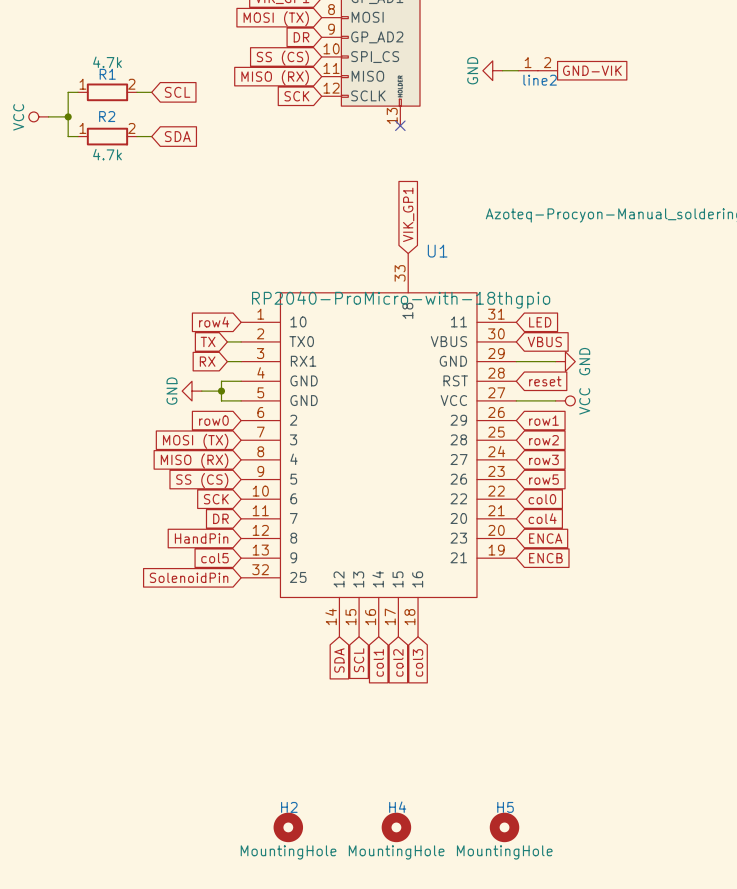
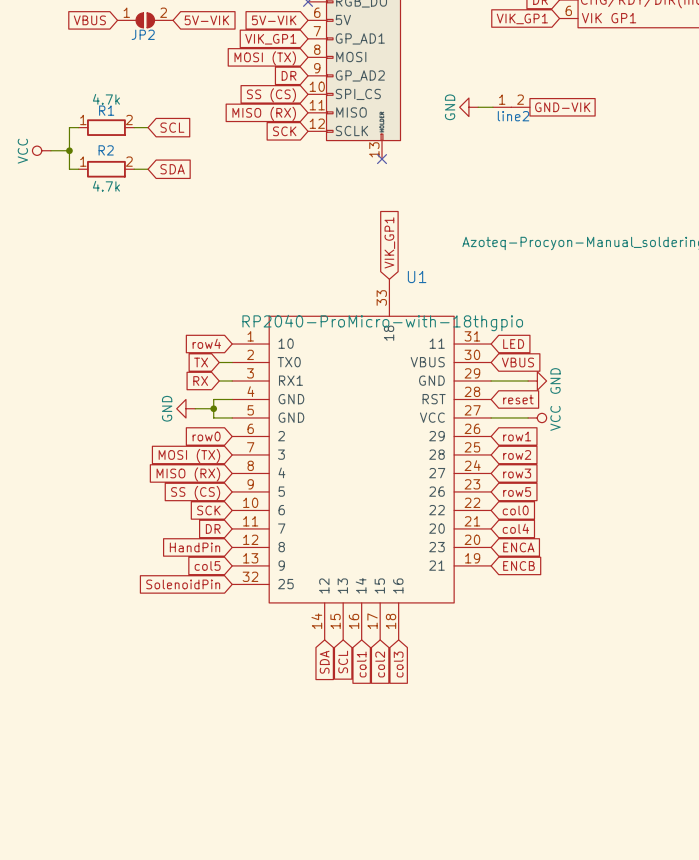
H2: MountingHole (288, 827) -> none
H4: MountingHole (396, 827) -> none
H5: MountingHole (504, 827) -> none

